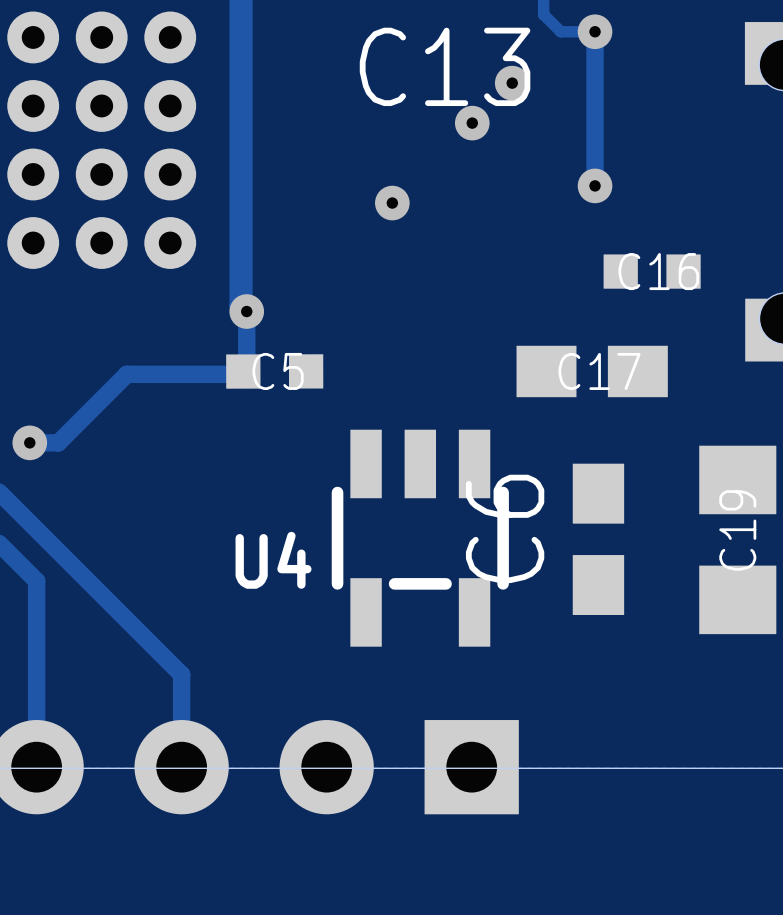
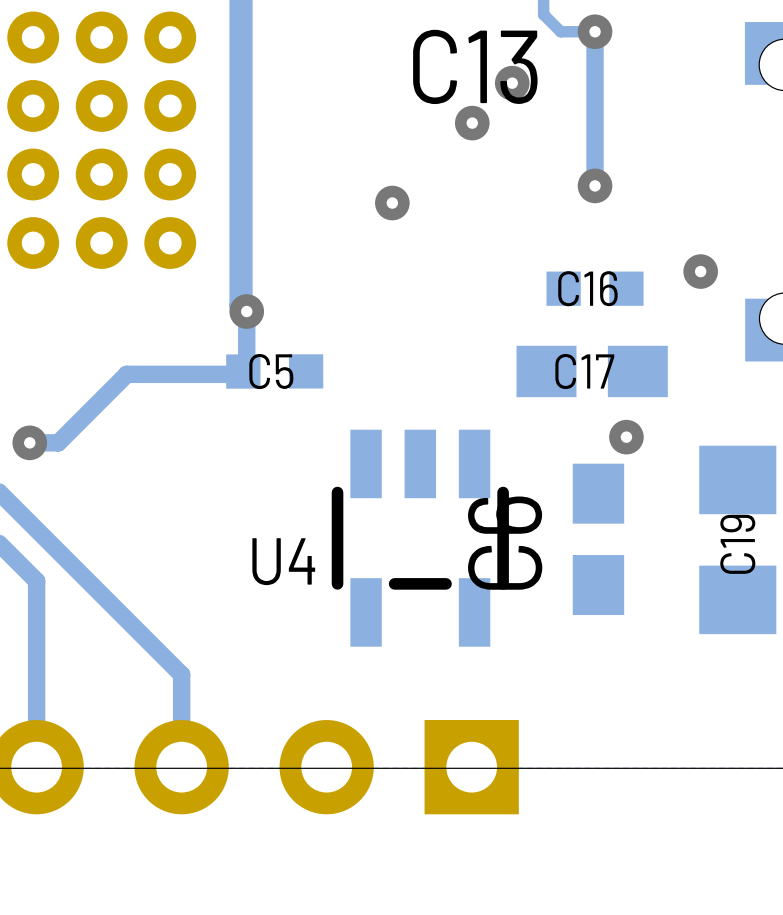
C16 position: (652, 271) -> (595, 288)
via: none -> (700, 271)
via: none -> (626, 437)

